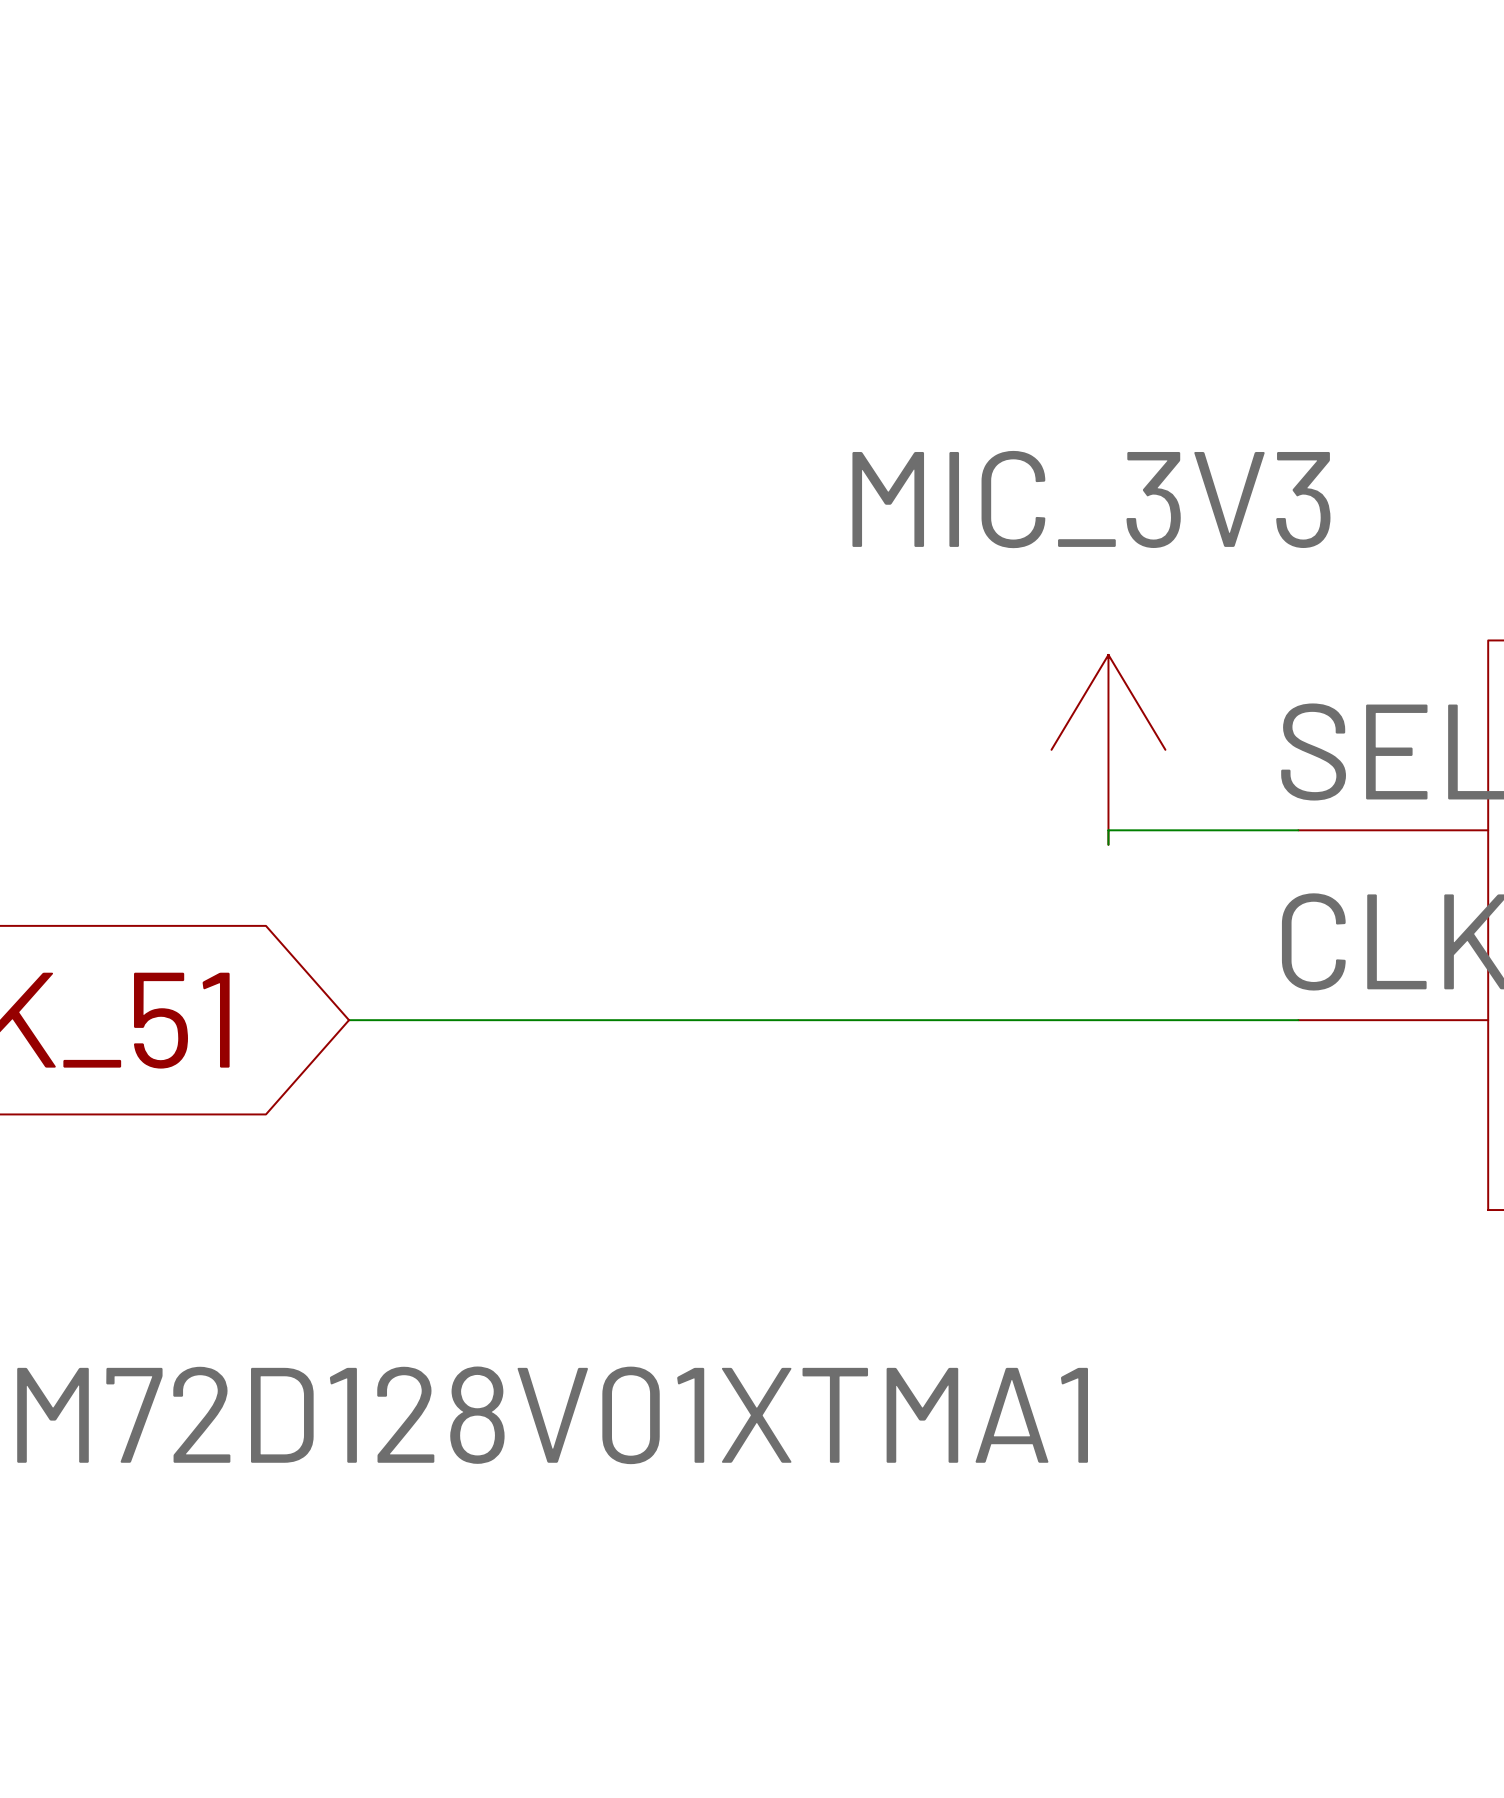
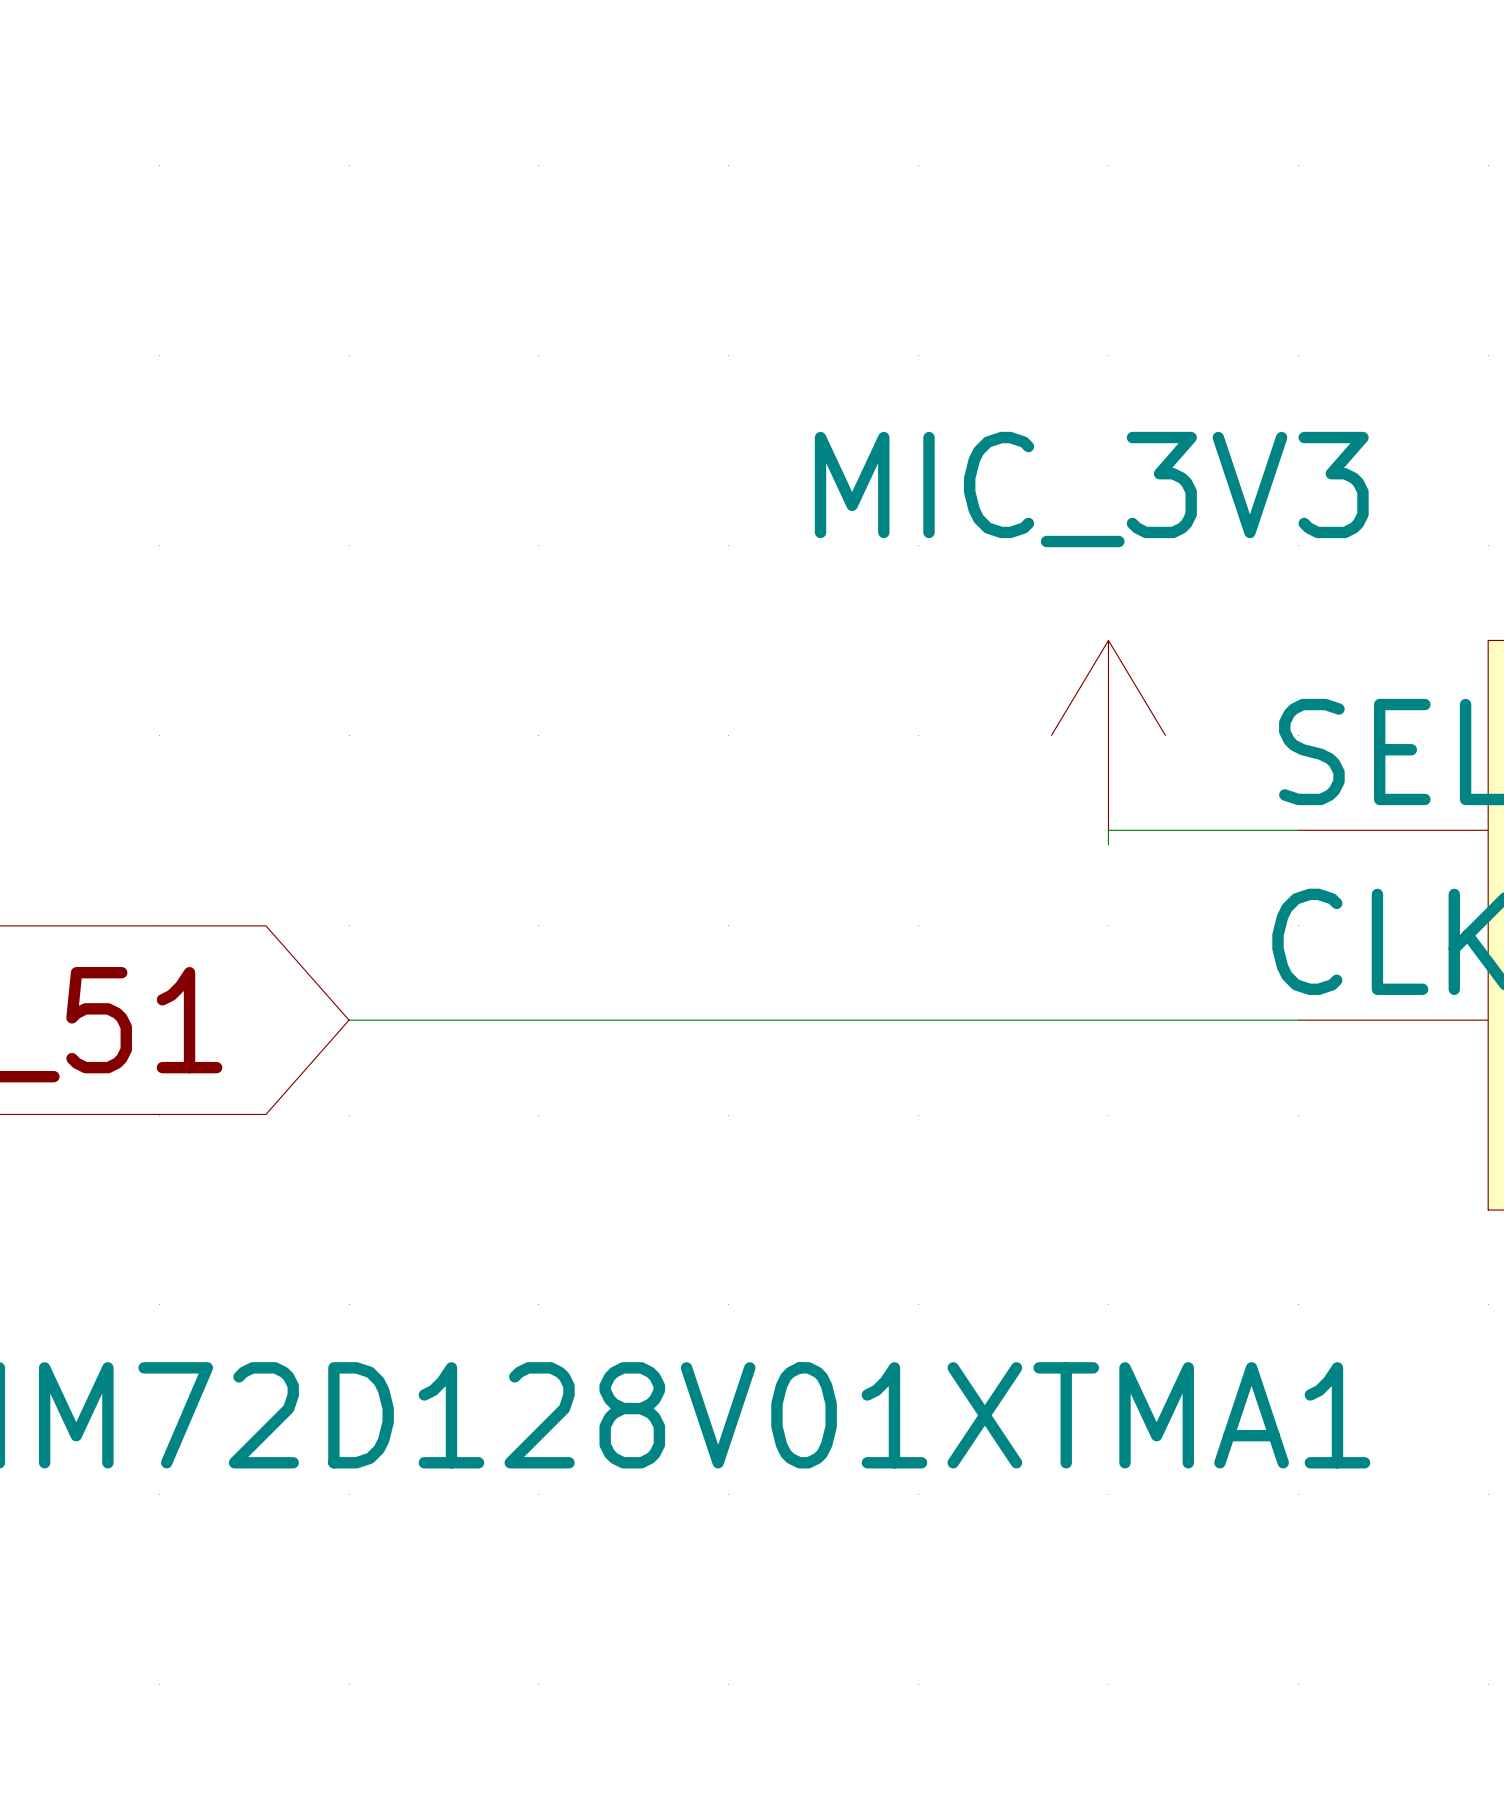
power symbol position: MIC_3V3 (1108, 749) -> MIC_3V3 (1108, 735)

